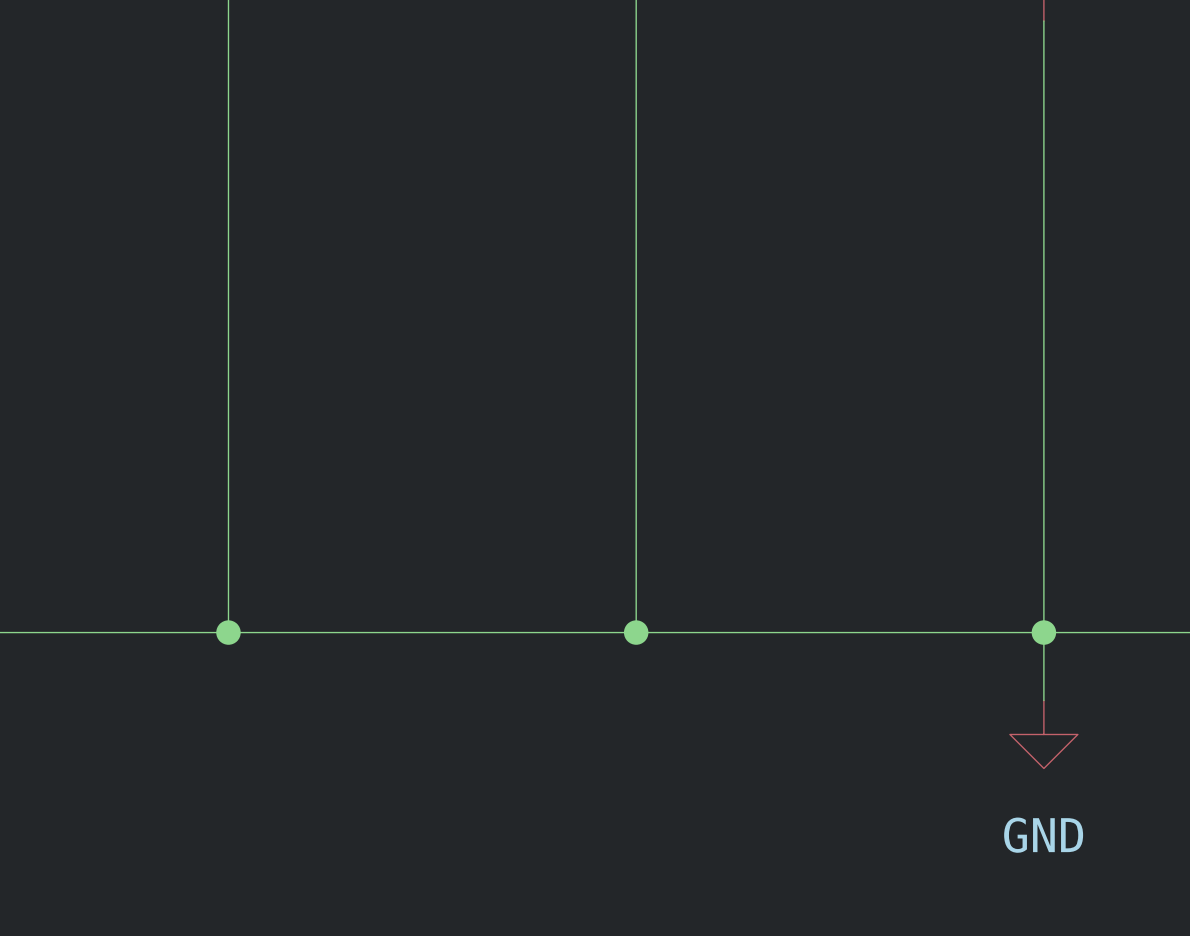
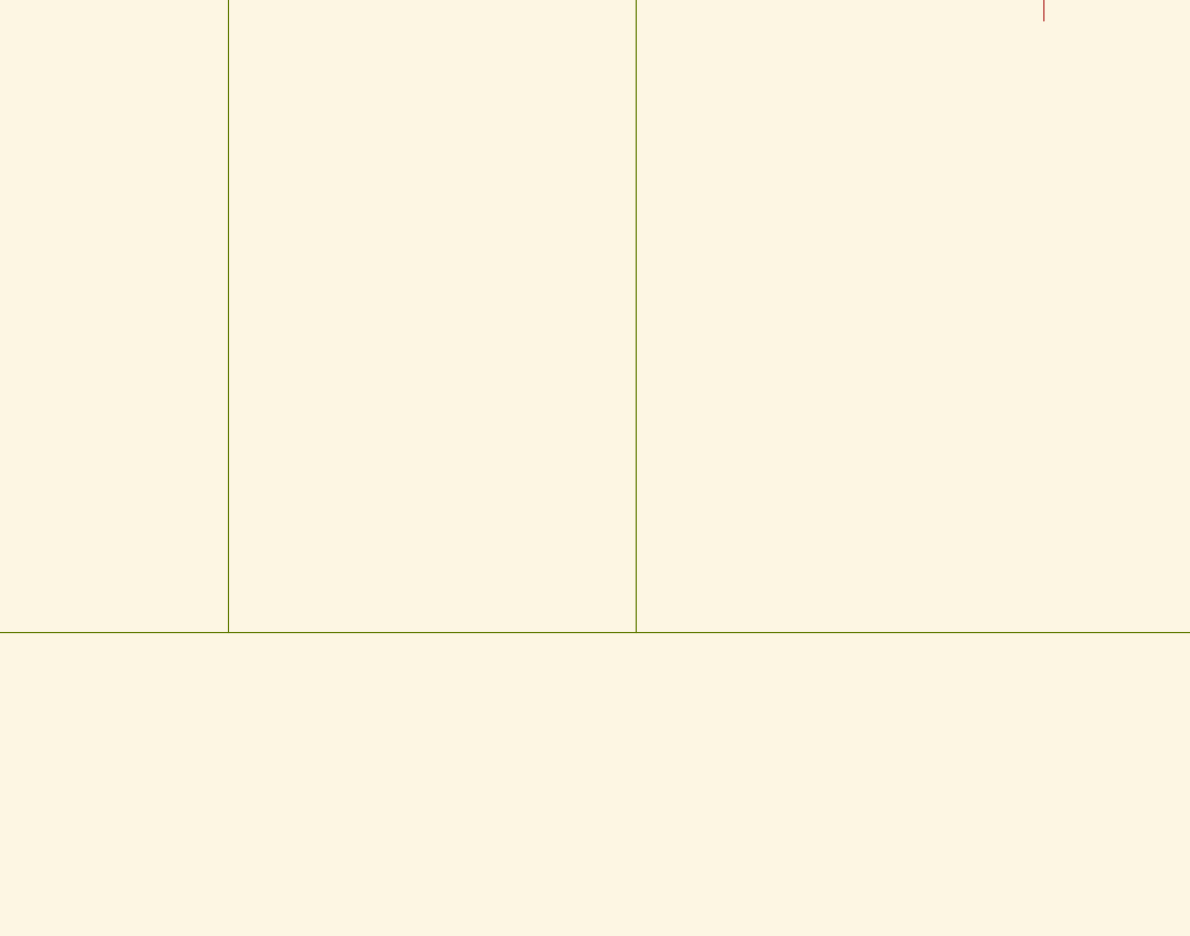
wire: (1043, 20) (1043, 700) -> none
junction: (228, 632) -> none
junction: (636, 632) -> none
junction: (1043, 632) -> none
power symbol: GND (1043, 734) -> none

